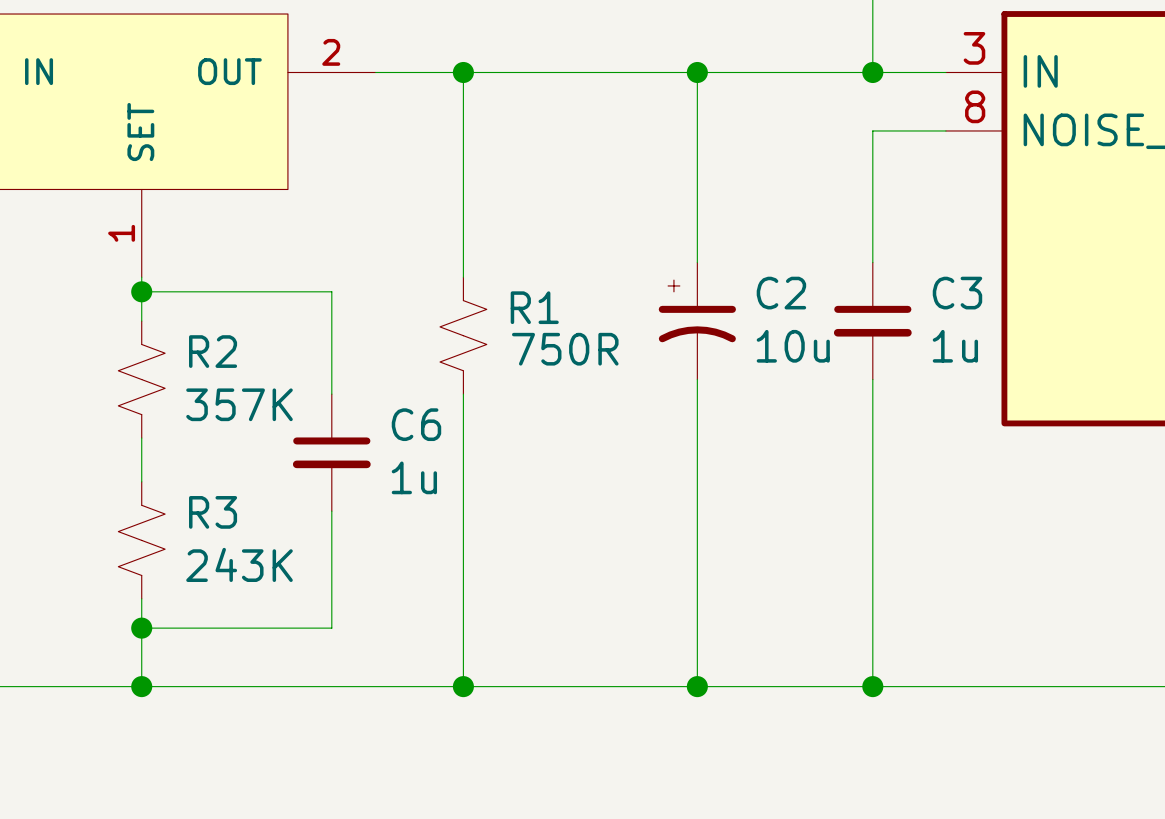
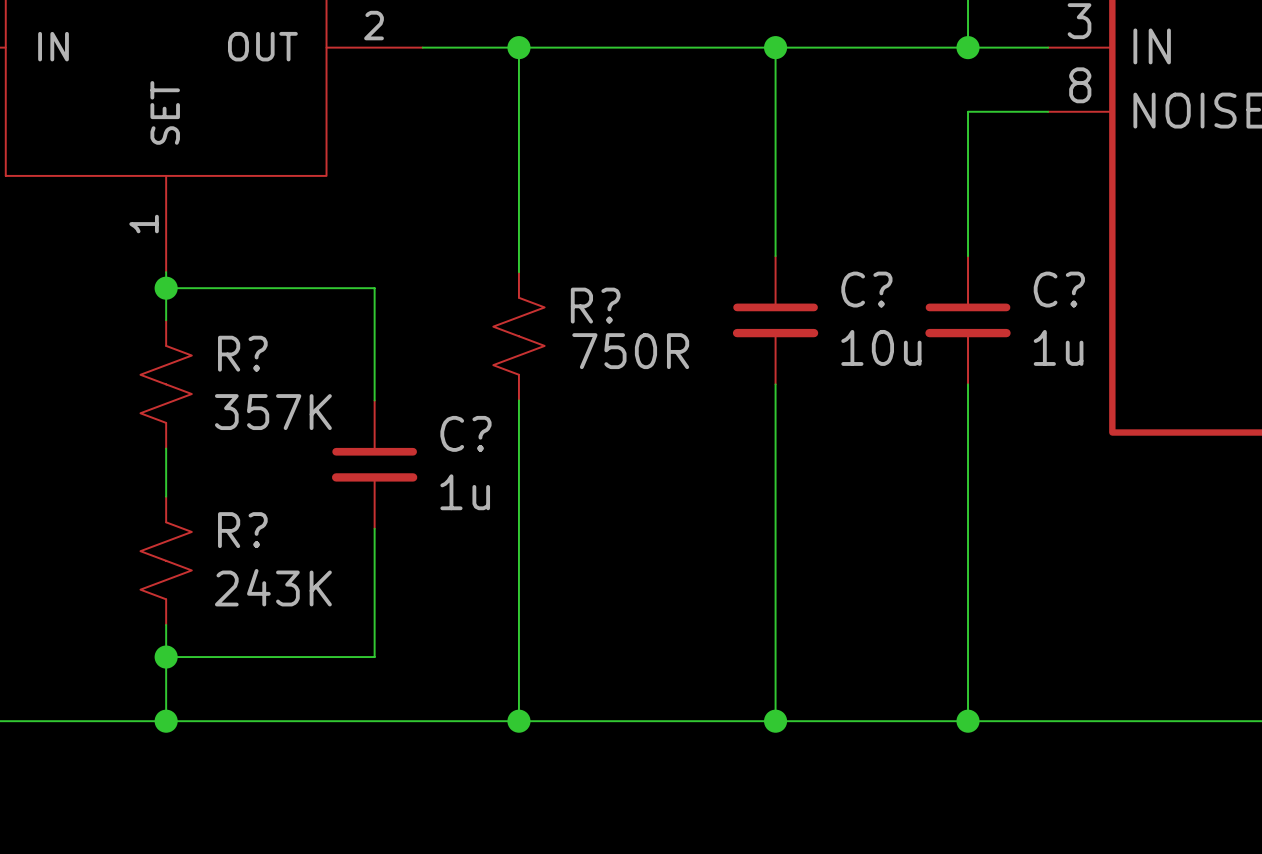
C3 name: C3 (957, 293) -> C? (1059, 289)
R1 name: R1 (534, 307) -> R? (595, 305)
C2: 10u (697, 321) -> none
C?: none -> 10u (775, 320)
R2 name: R2 (213, 351) -> R? (242, 353)
C6 name: C6 (416, 424) -> C? (465, 433)
R3 name: R3 (213, 512) -> R? (242, 530)

